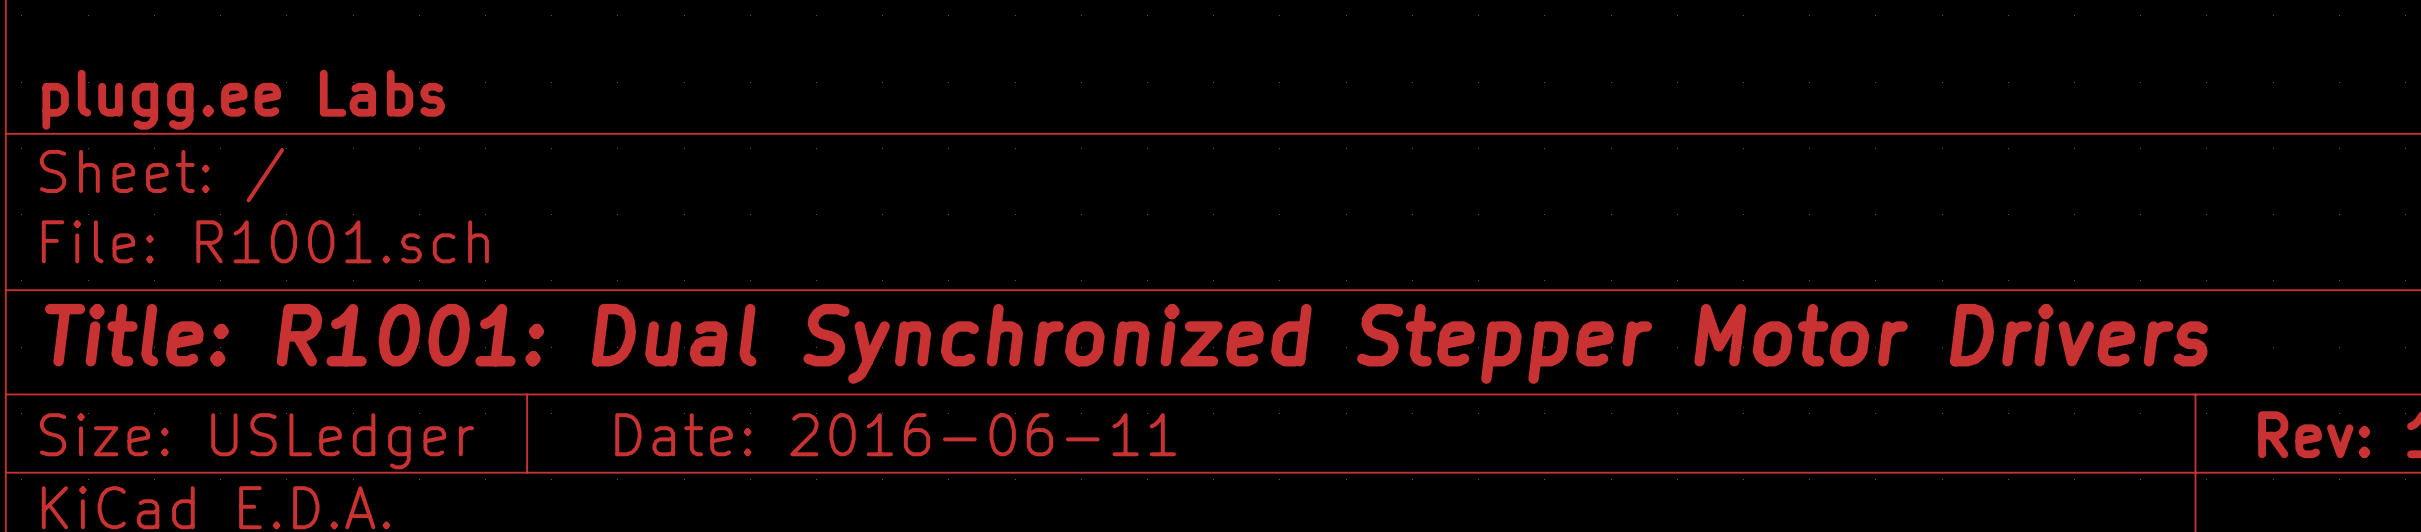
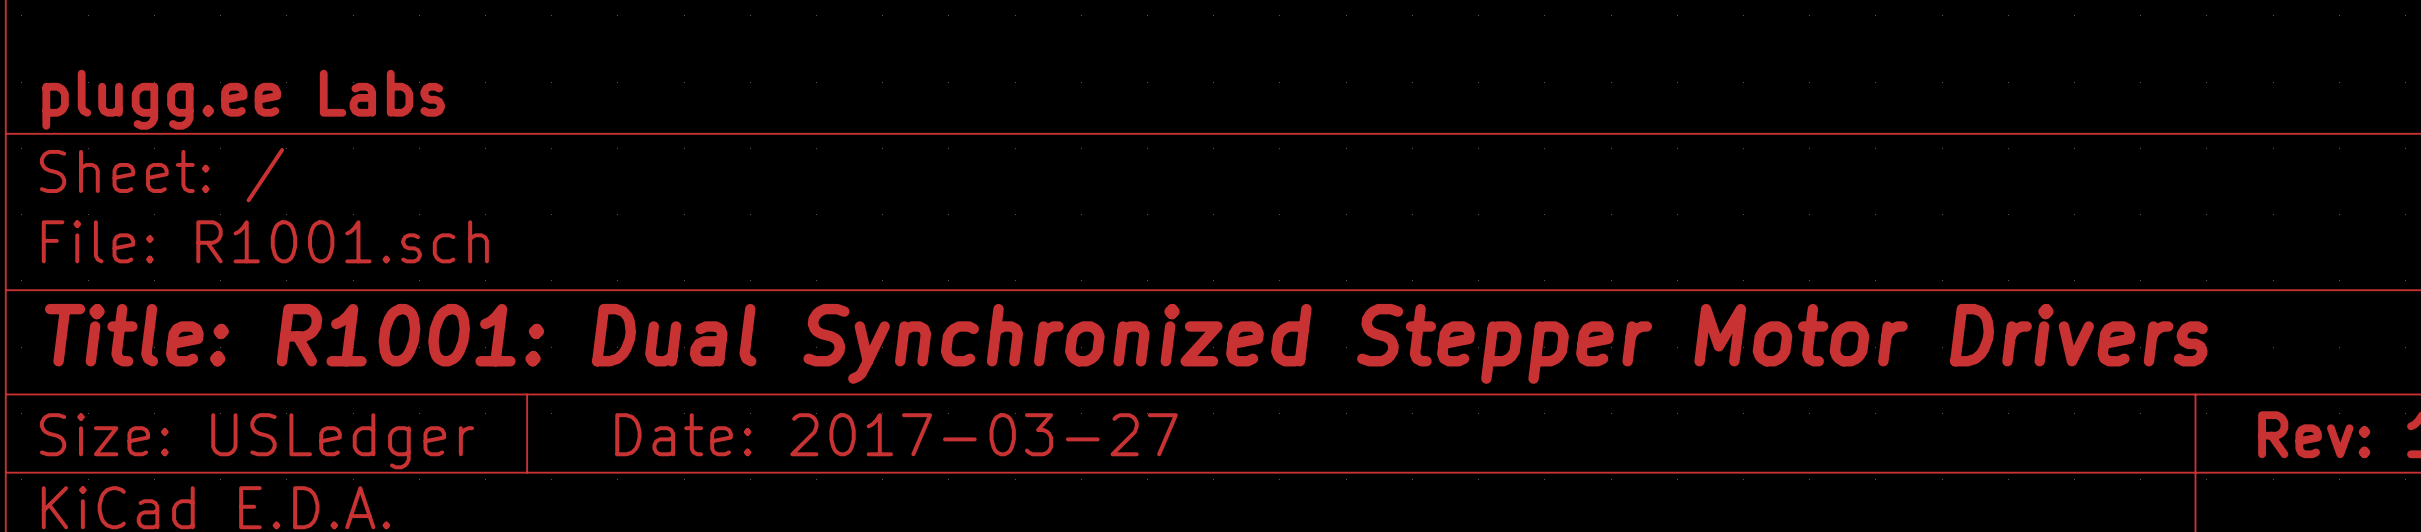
title block: Date: 2016-06-11 (895, 434) -> Date: 2017-03-27 (896, 434)

